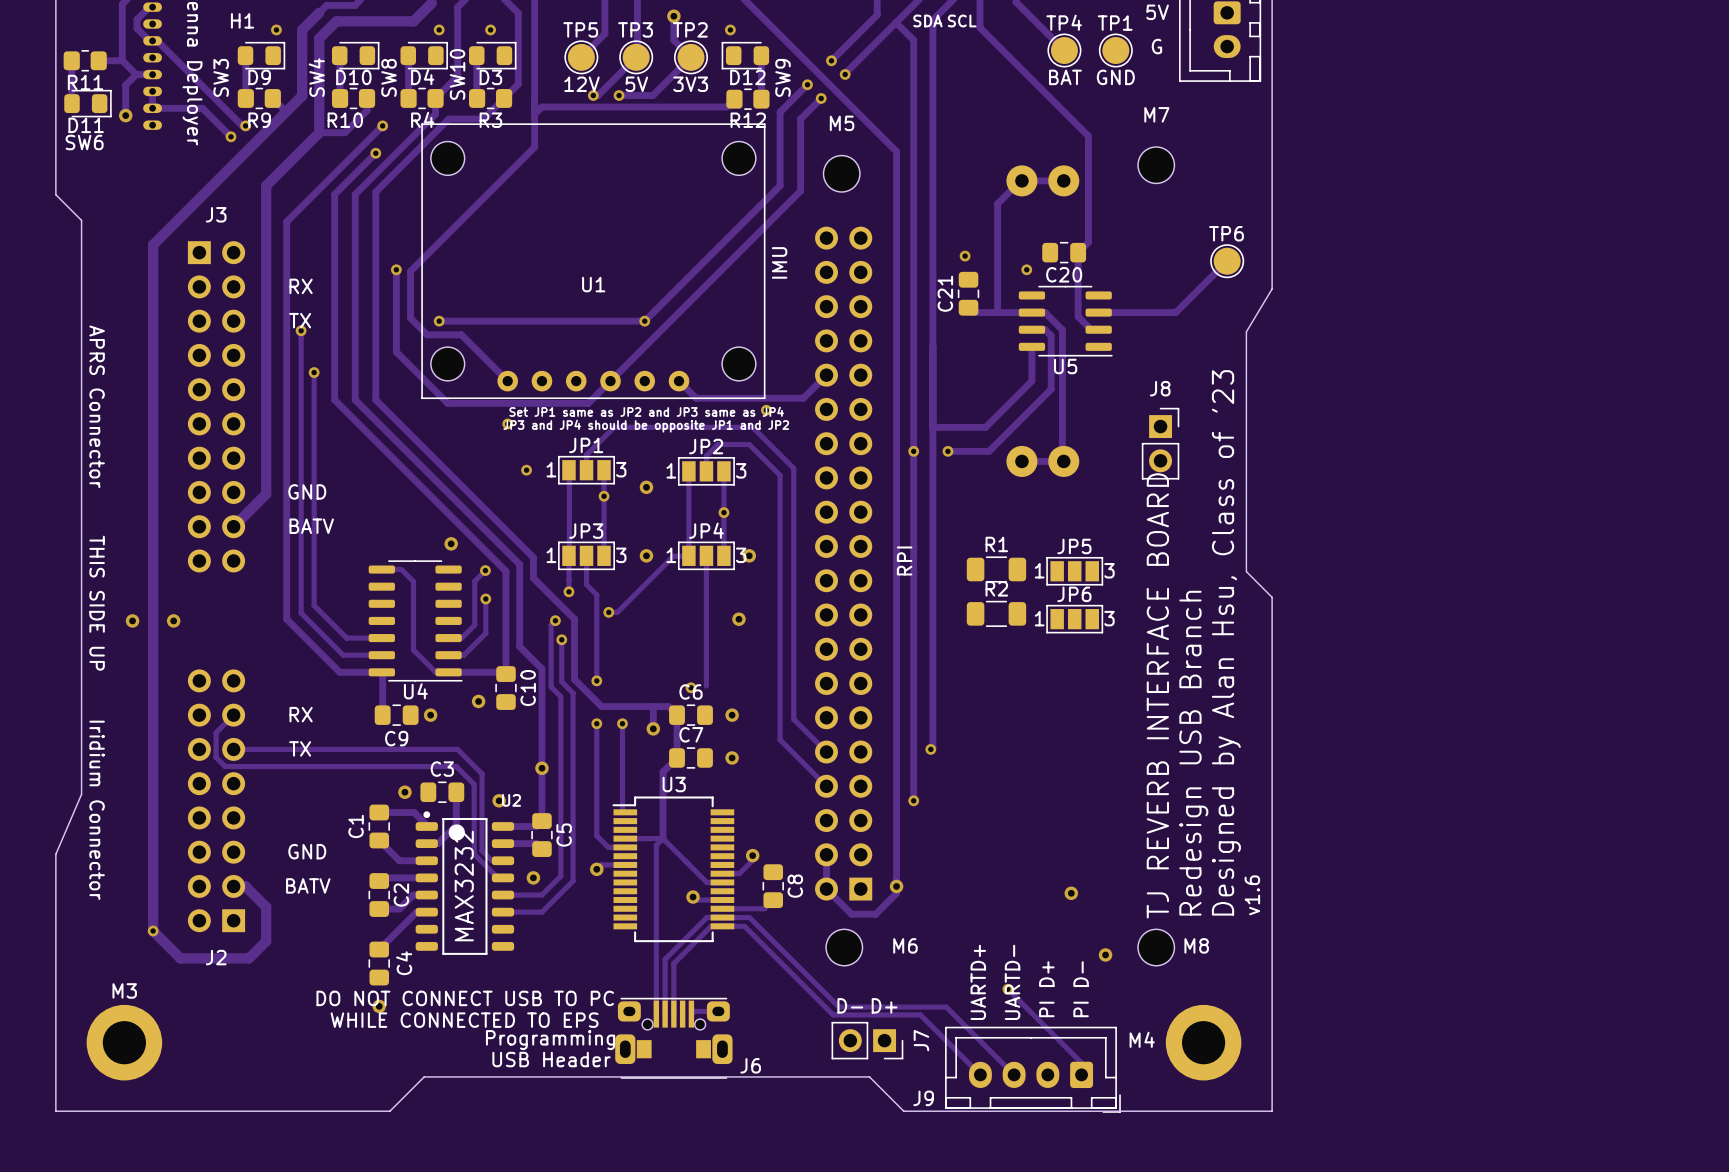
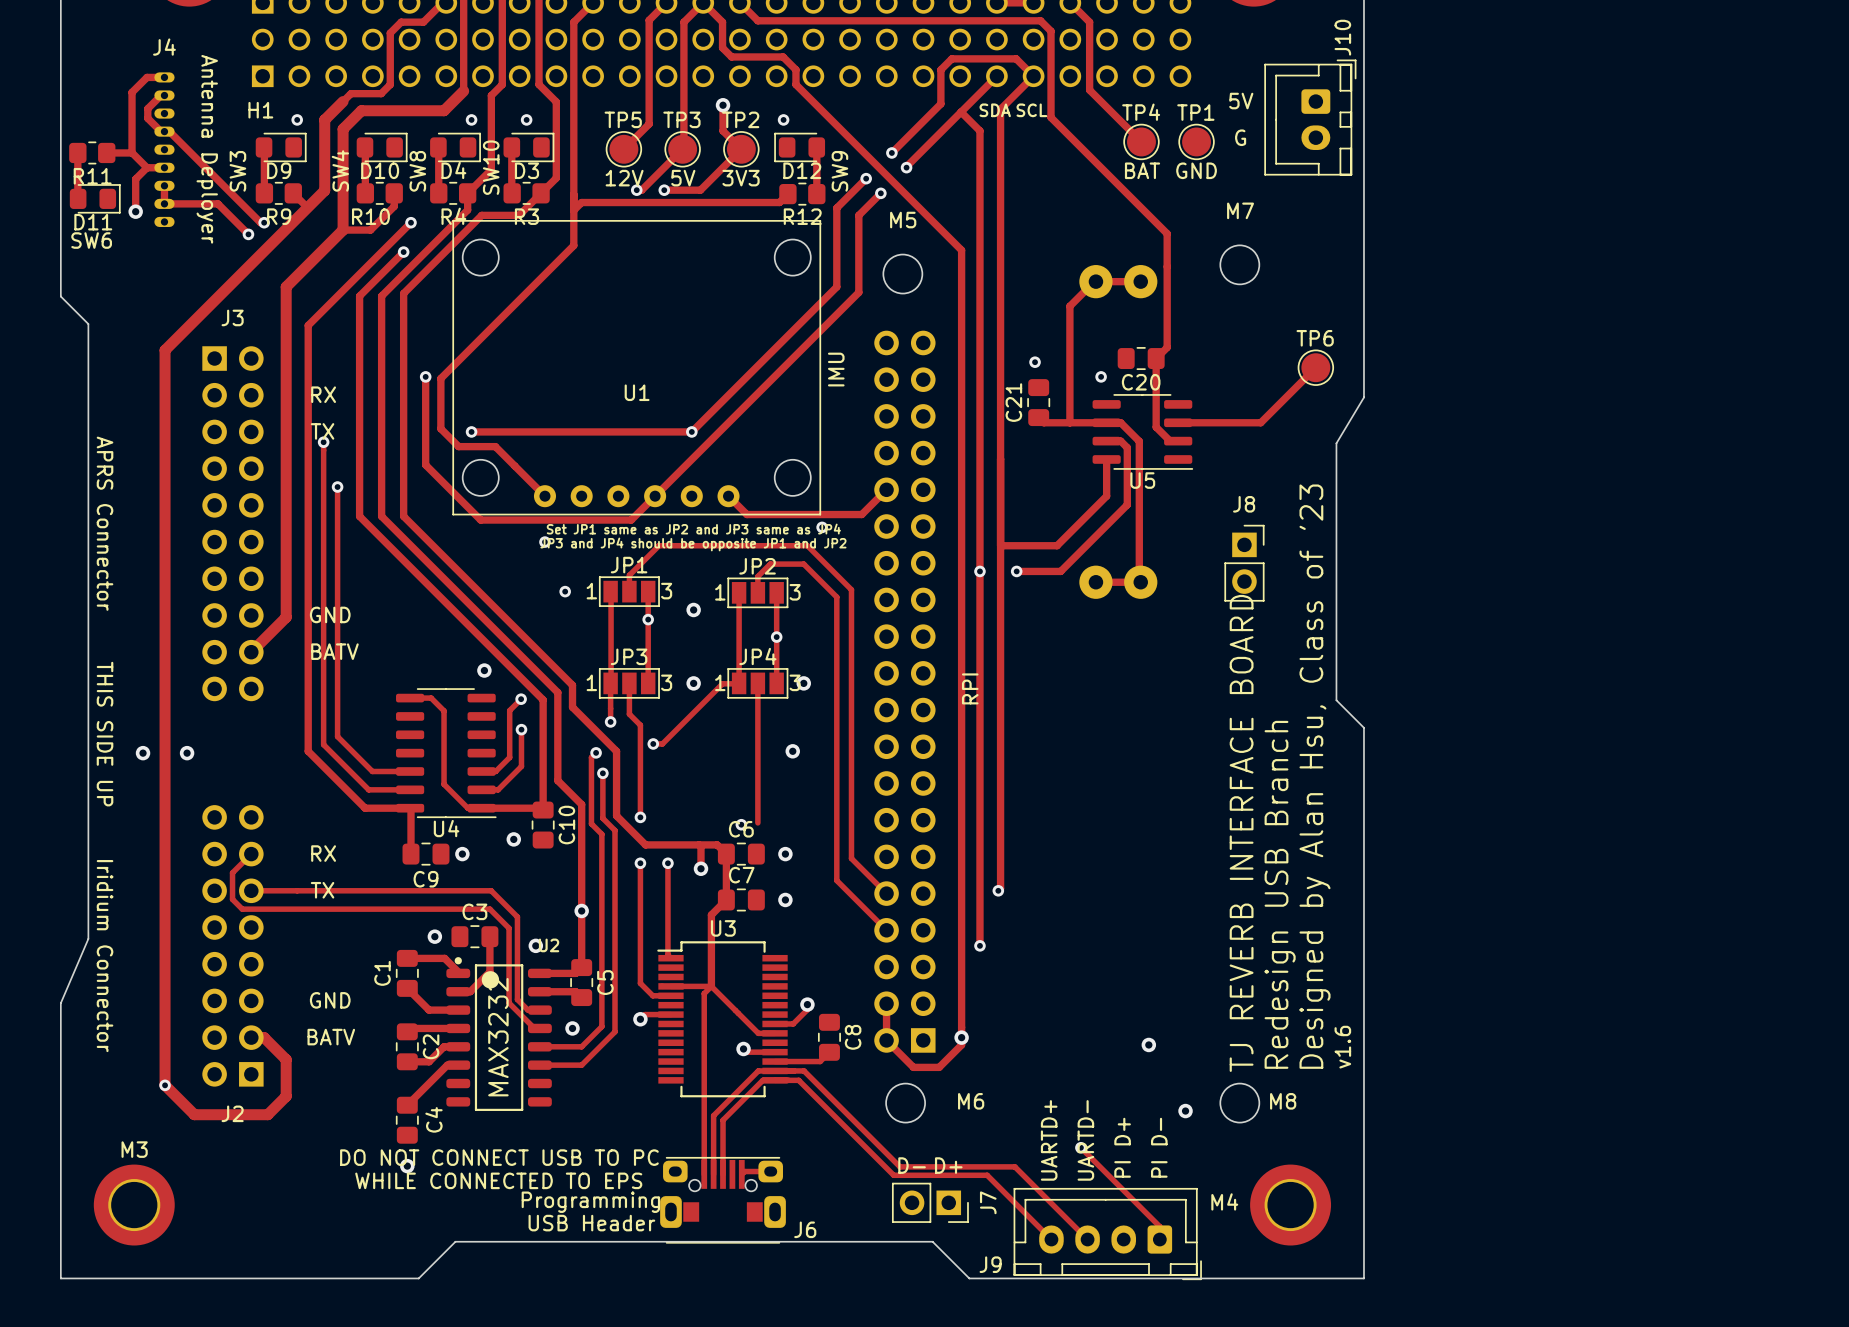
R1: (996, 569) -> none
JP5: (1074, 571) -> none
R2: (996, 613) -> none
JP6: (1074, 619) -> none

